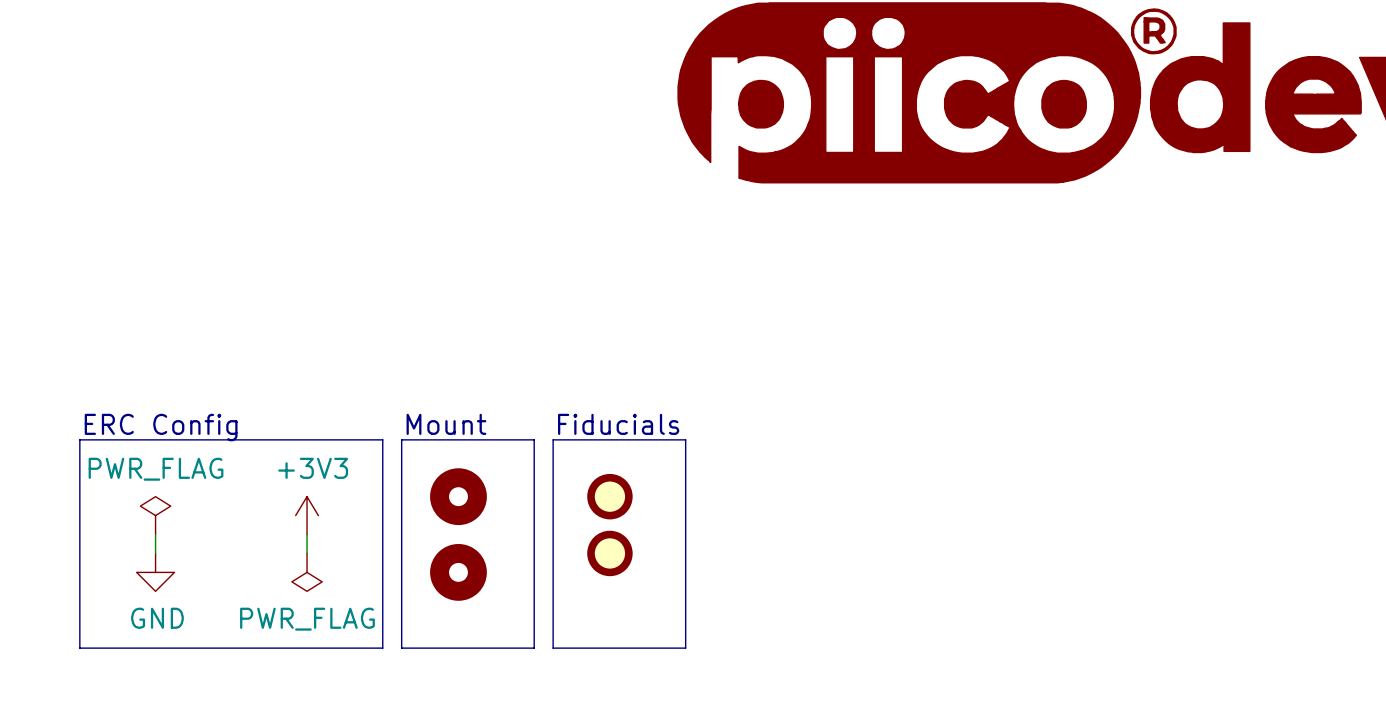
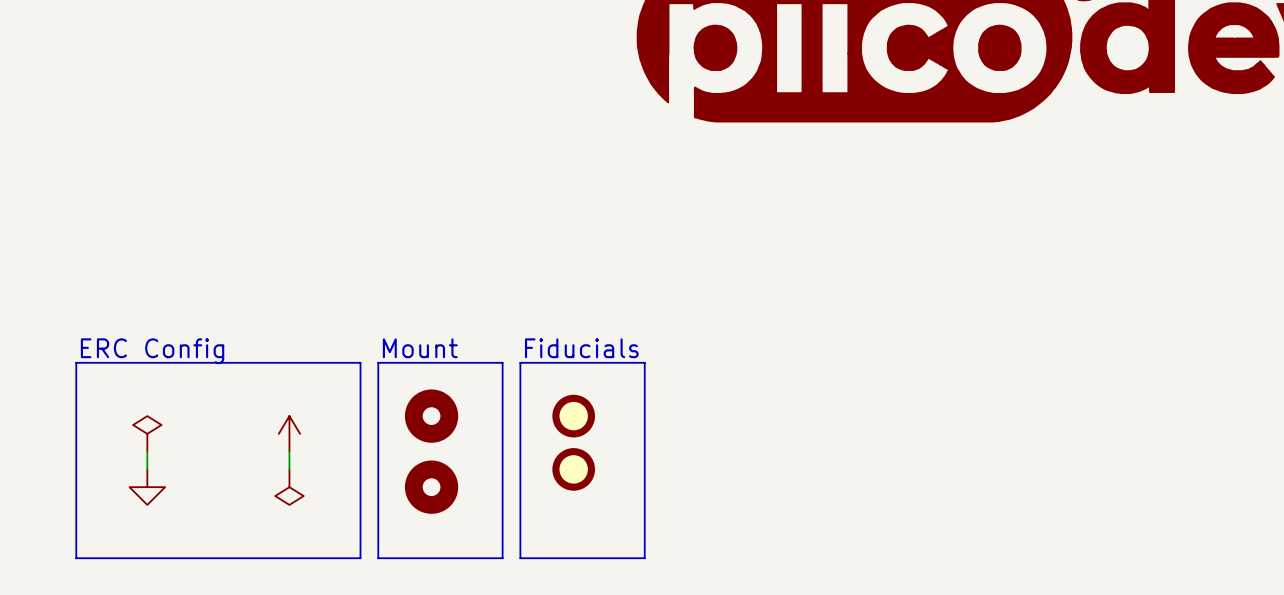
power symbol text: +3V3 (313, 468) -> none
power symbol text: PWR_FLAG (156, 469) -> none
power symbol text: GND (157, 618) -> none
power symbol text: PWR_FLAG (307, 619) -> none

